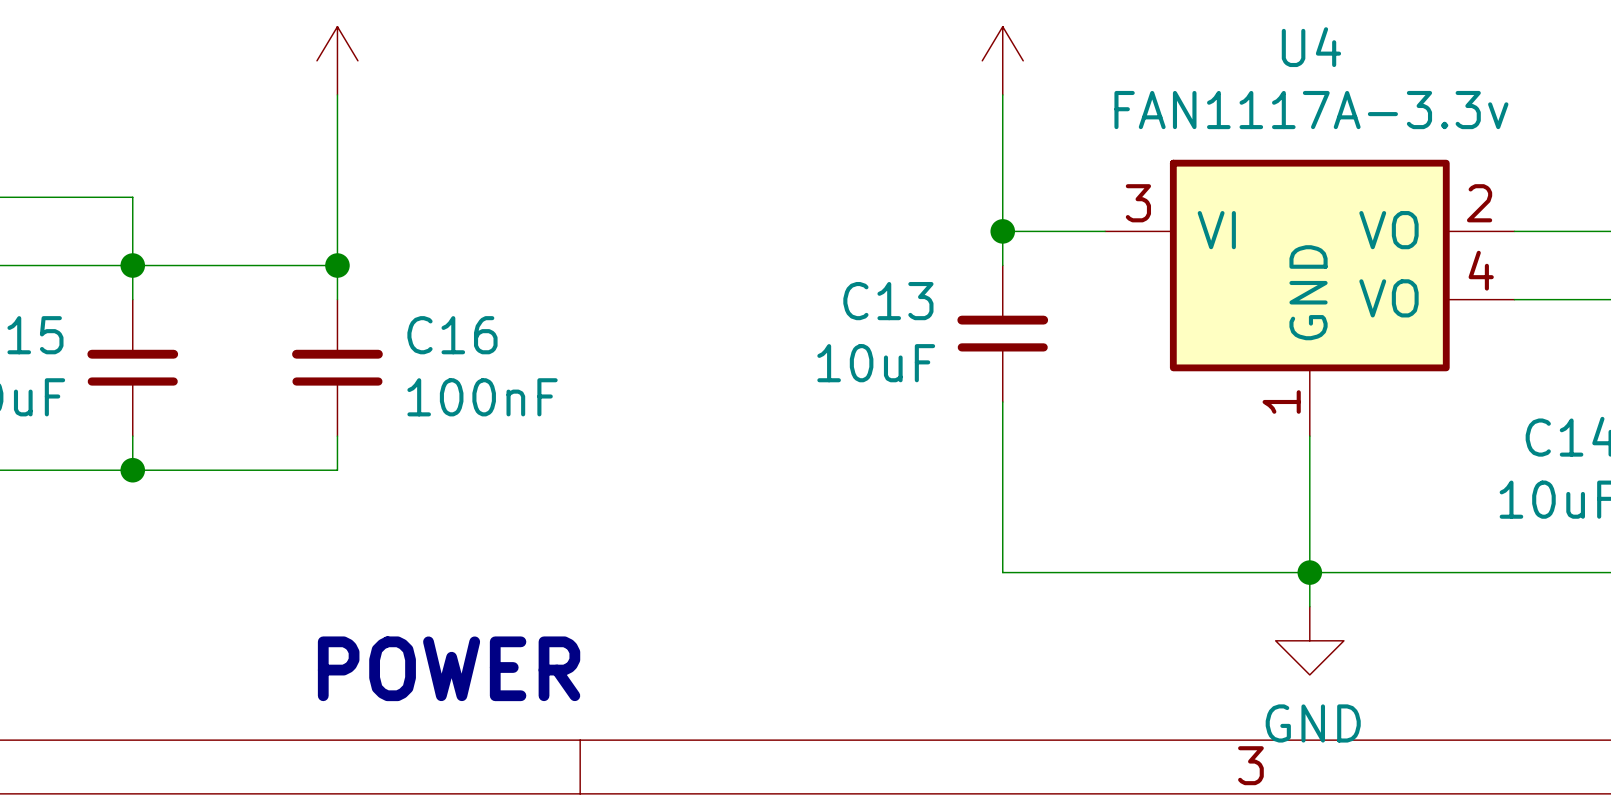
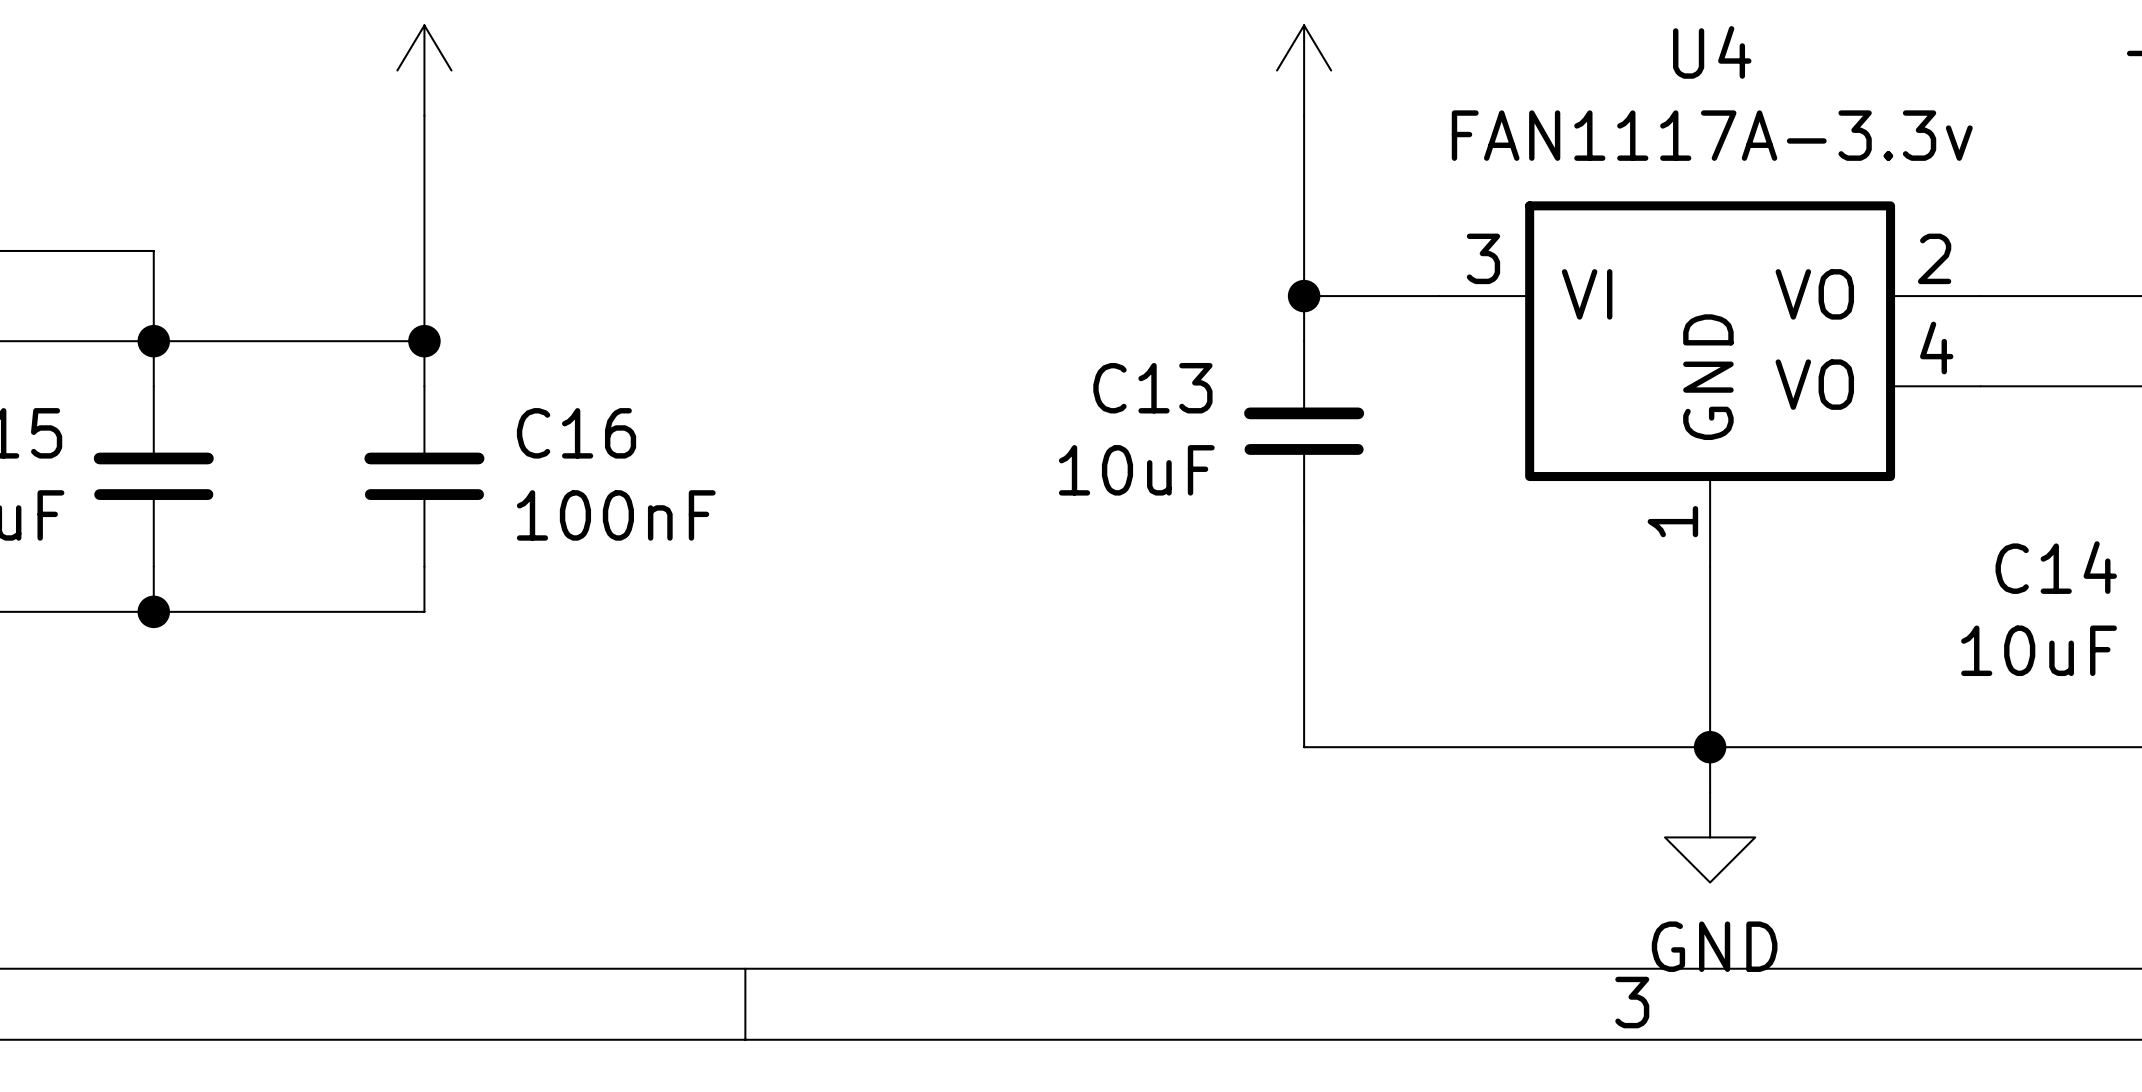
text: POWER (449, 668) -> none

